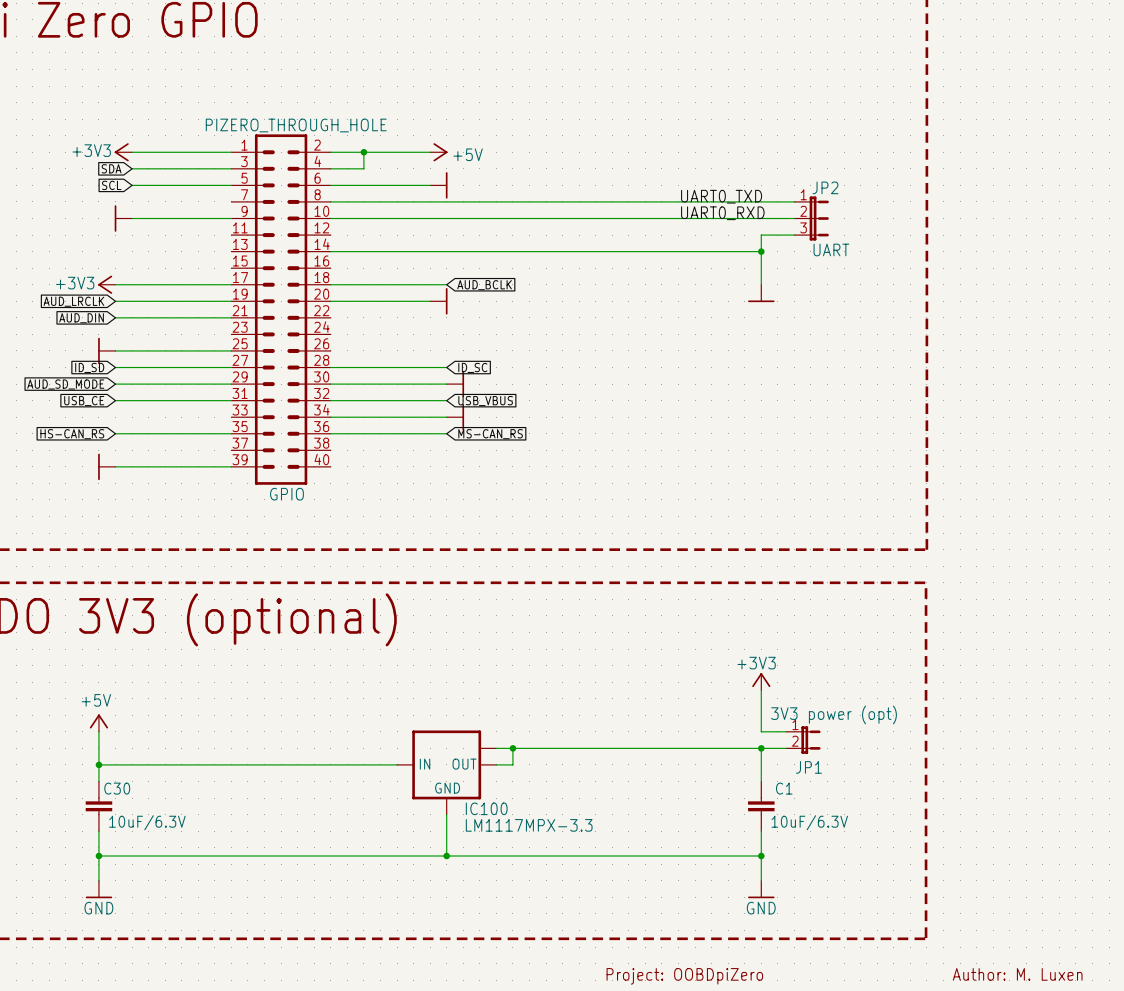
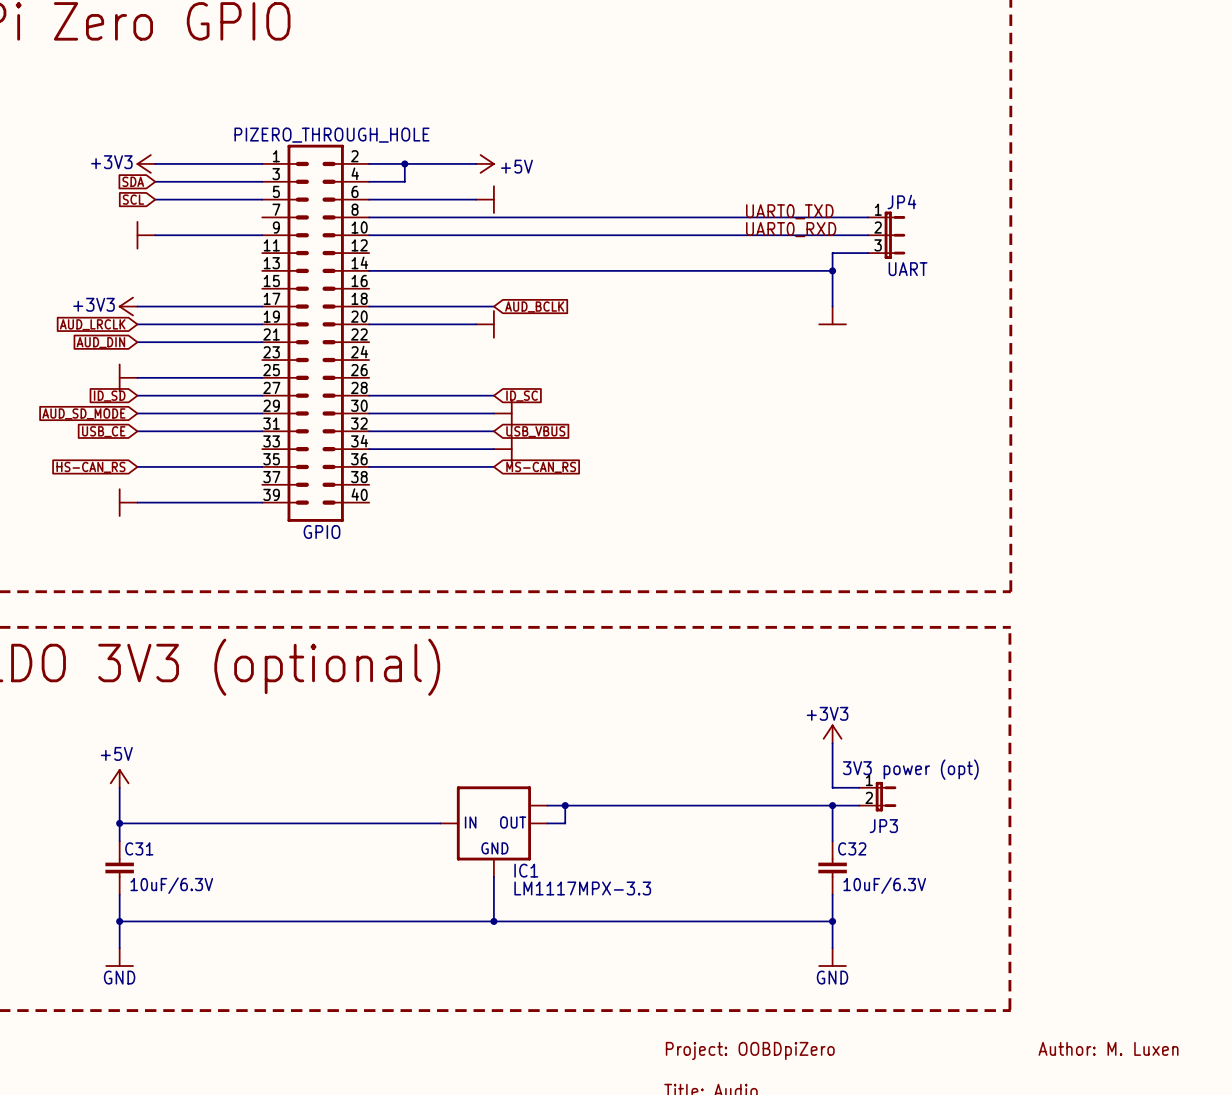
JP2 name: JP2 (825, 187) -> JP4 (901, 201)
JP1 name: JP1 (808, 767) -> JP3 (883, 826)
C30 name: C30 (117, 788) -> C31 (139, 848)
C1 name: C1 (784, 788) -> C32 (852, 848)
IC100 name: IC100 (486, 808) -> IC1 (526, 870)

